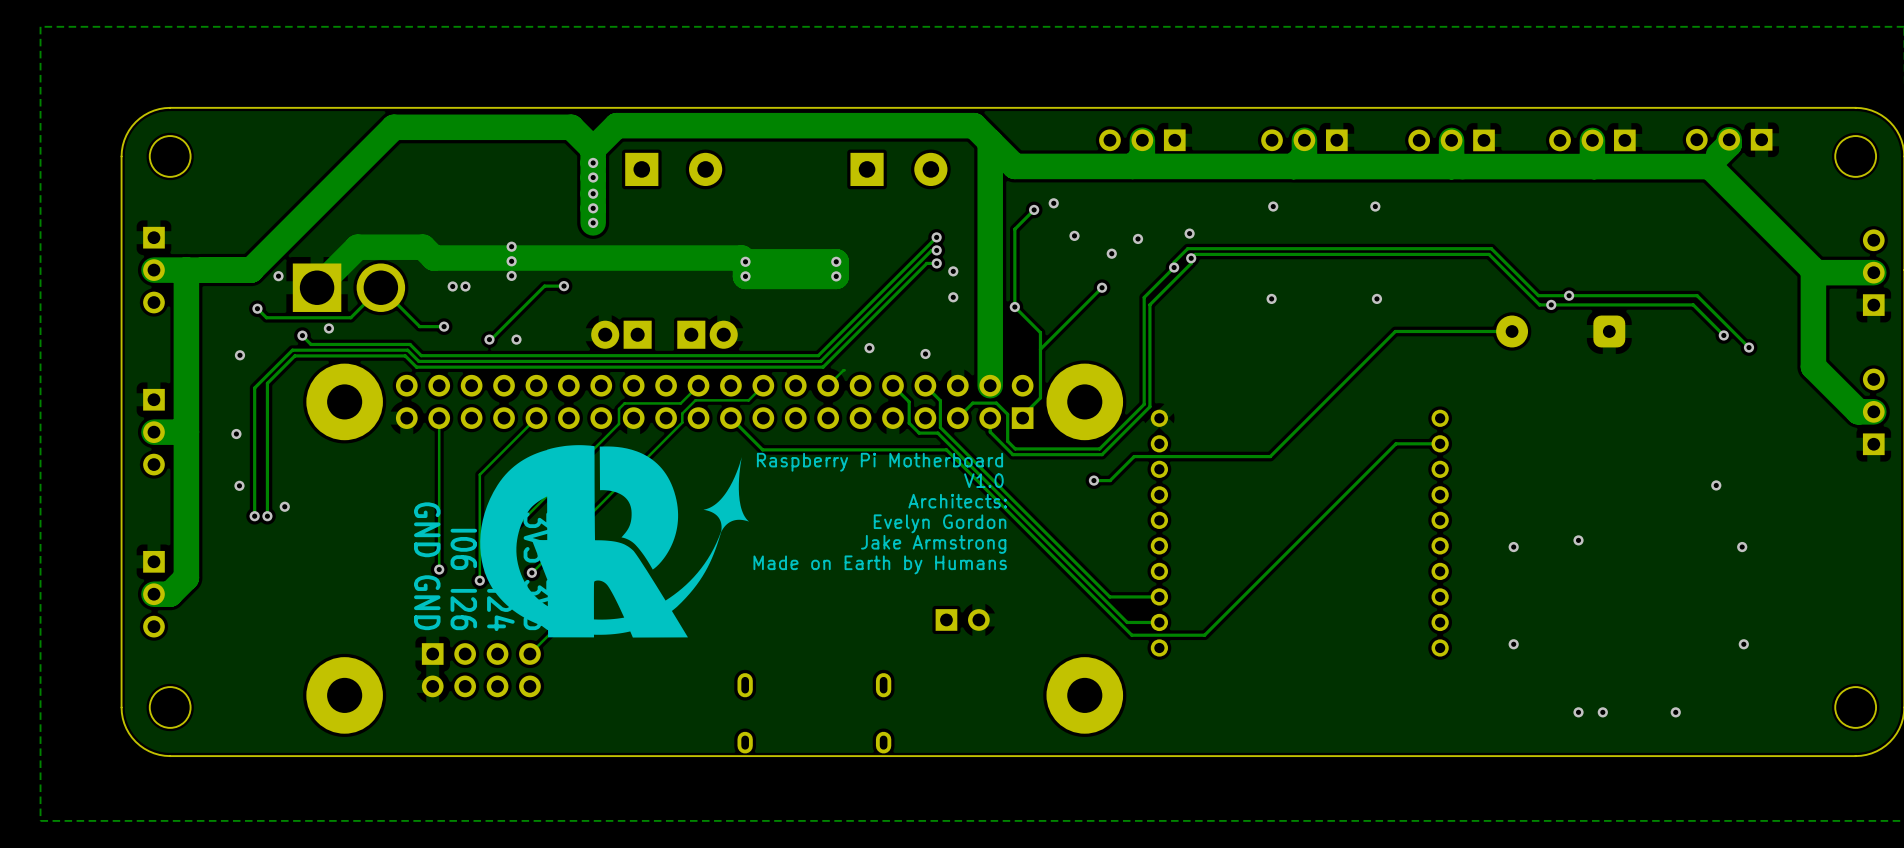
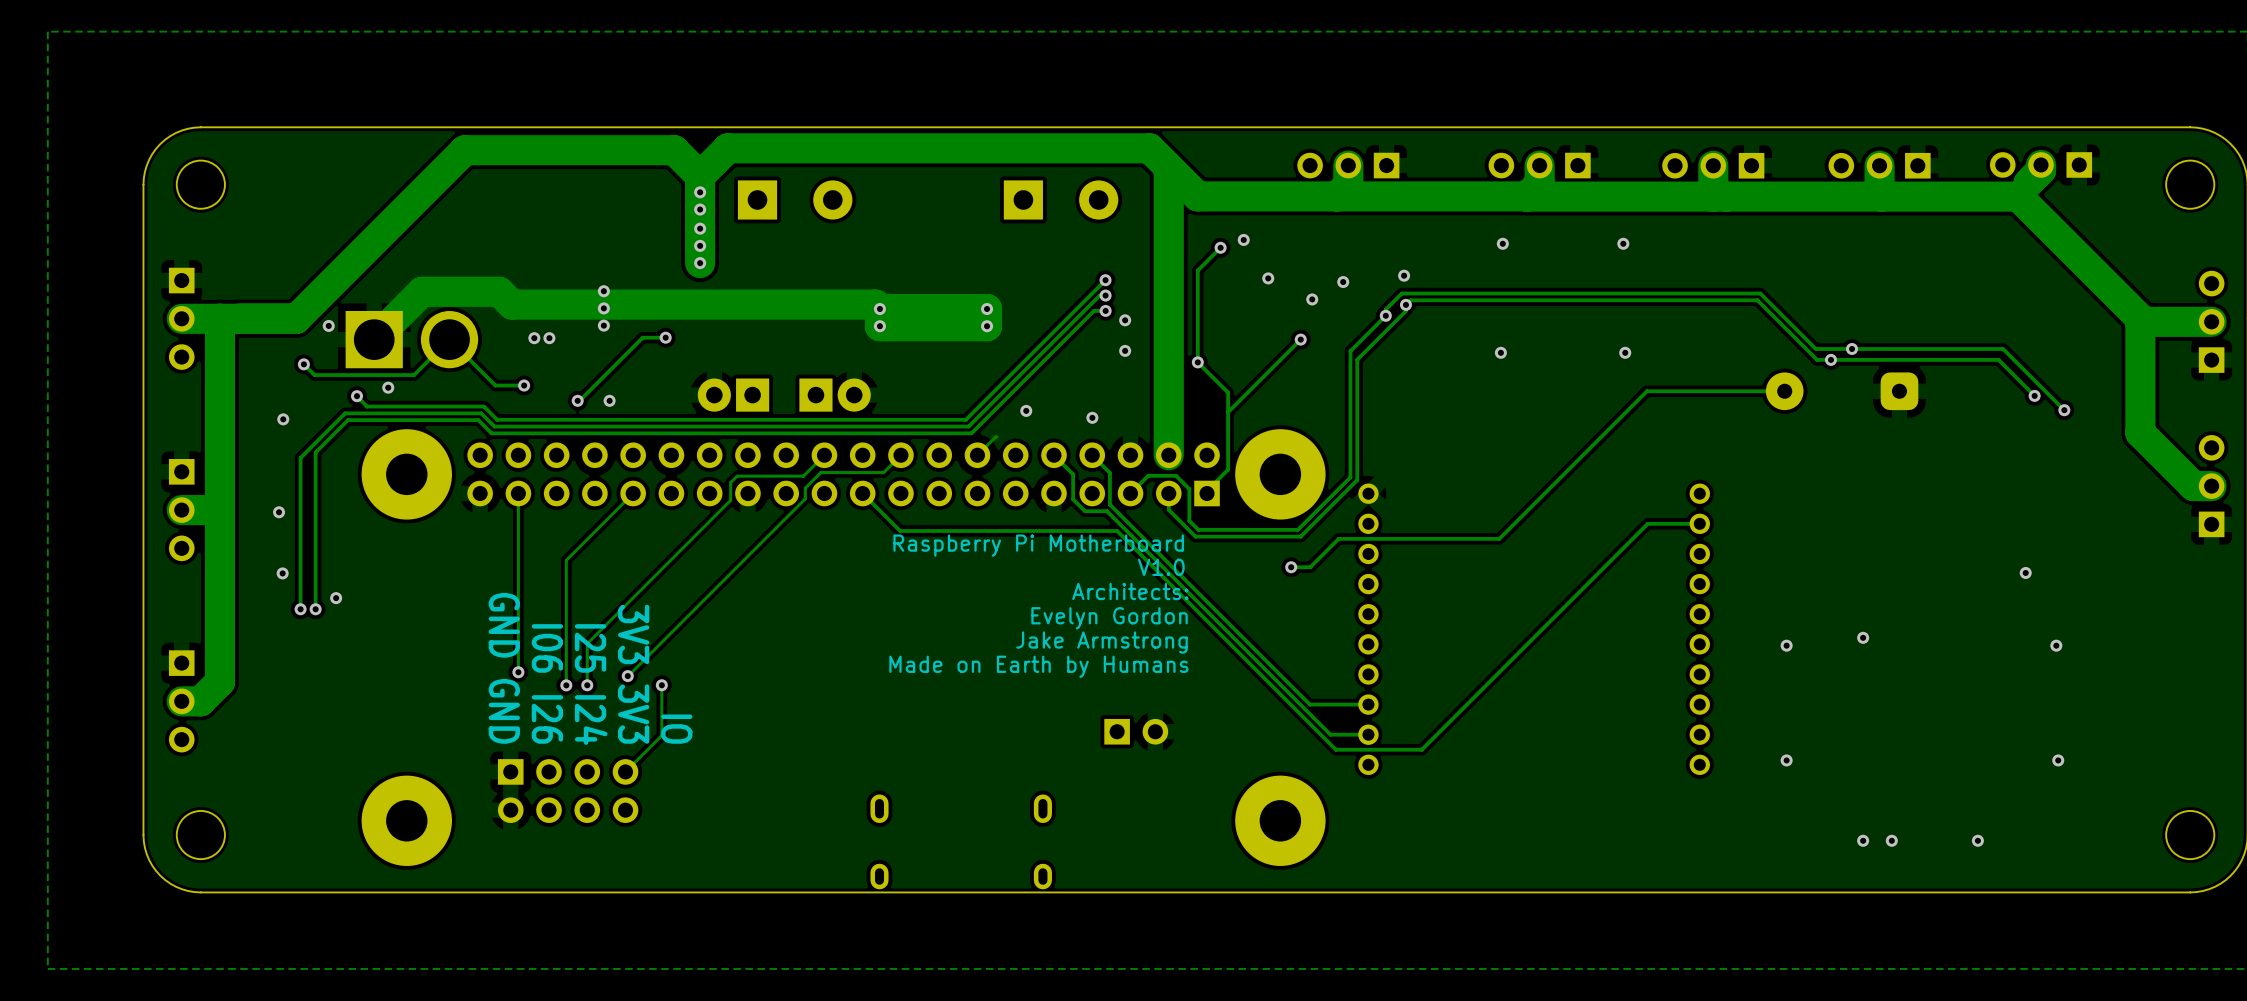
drawing: [480, 445, 750, 638] -> none

